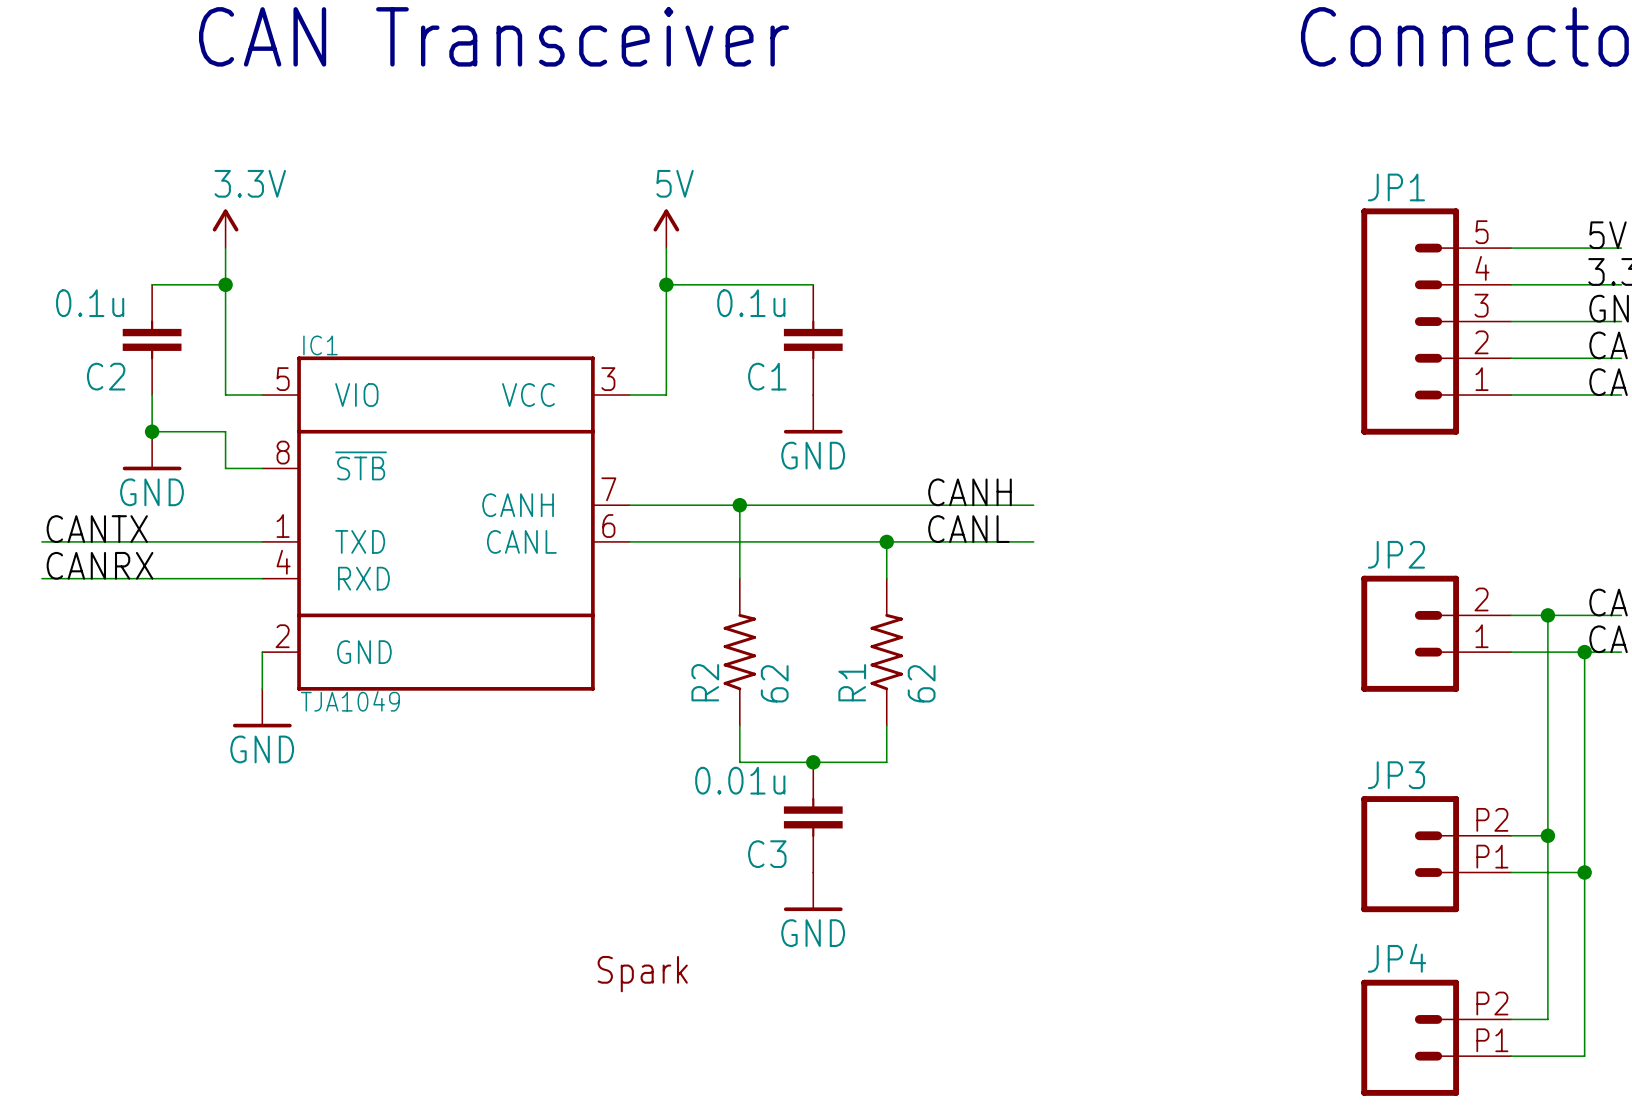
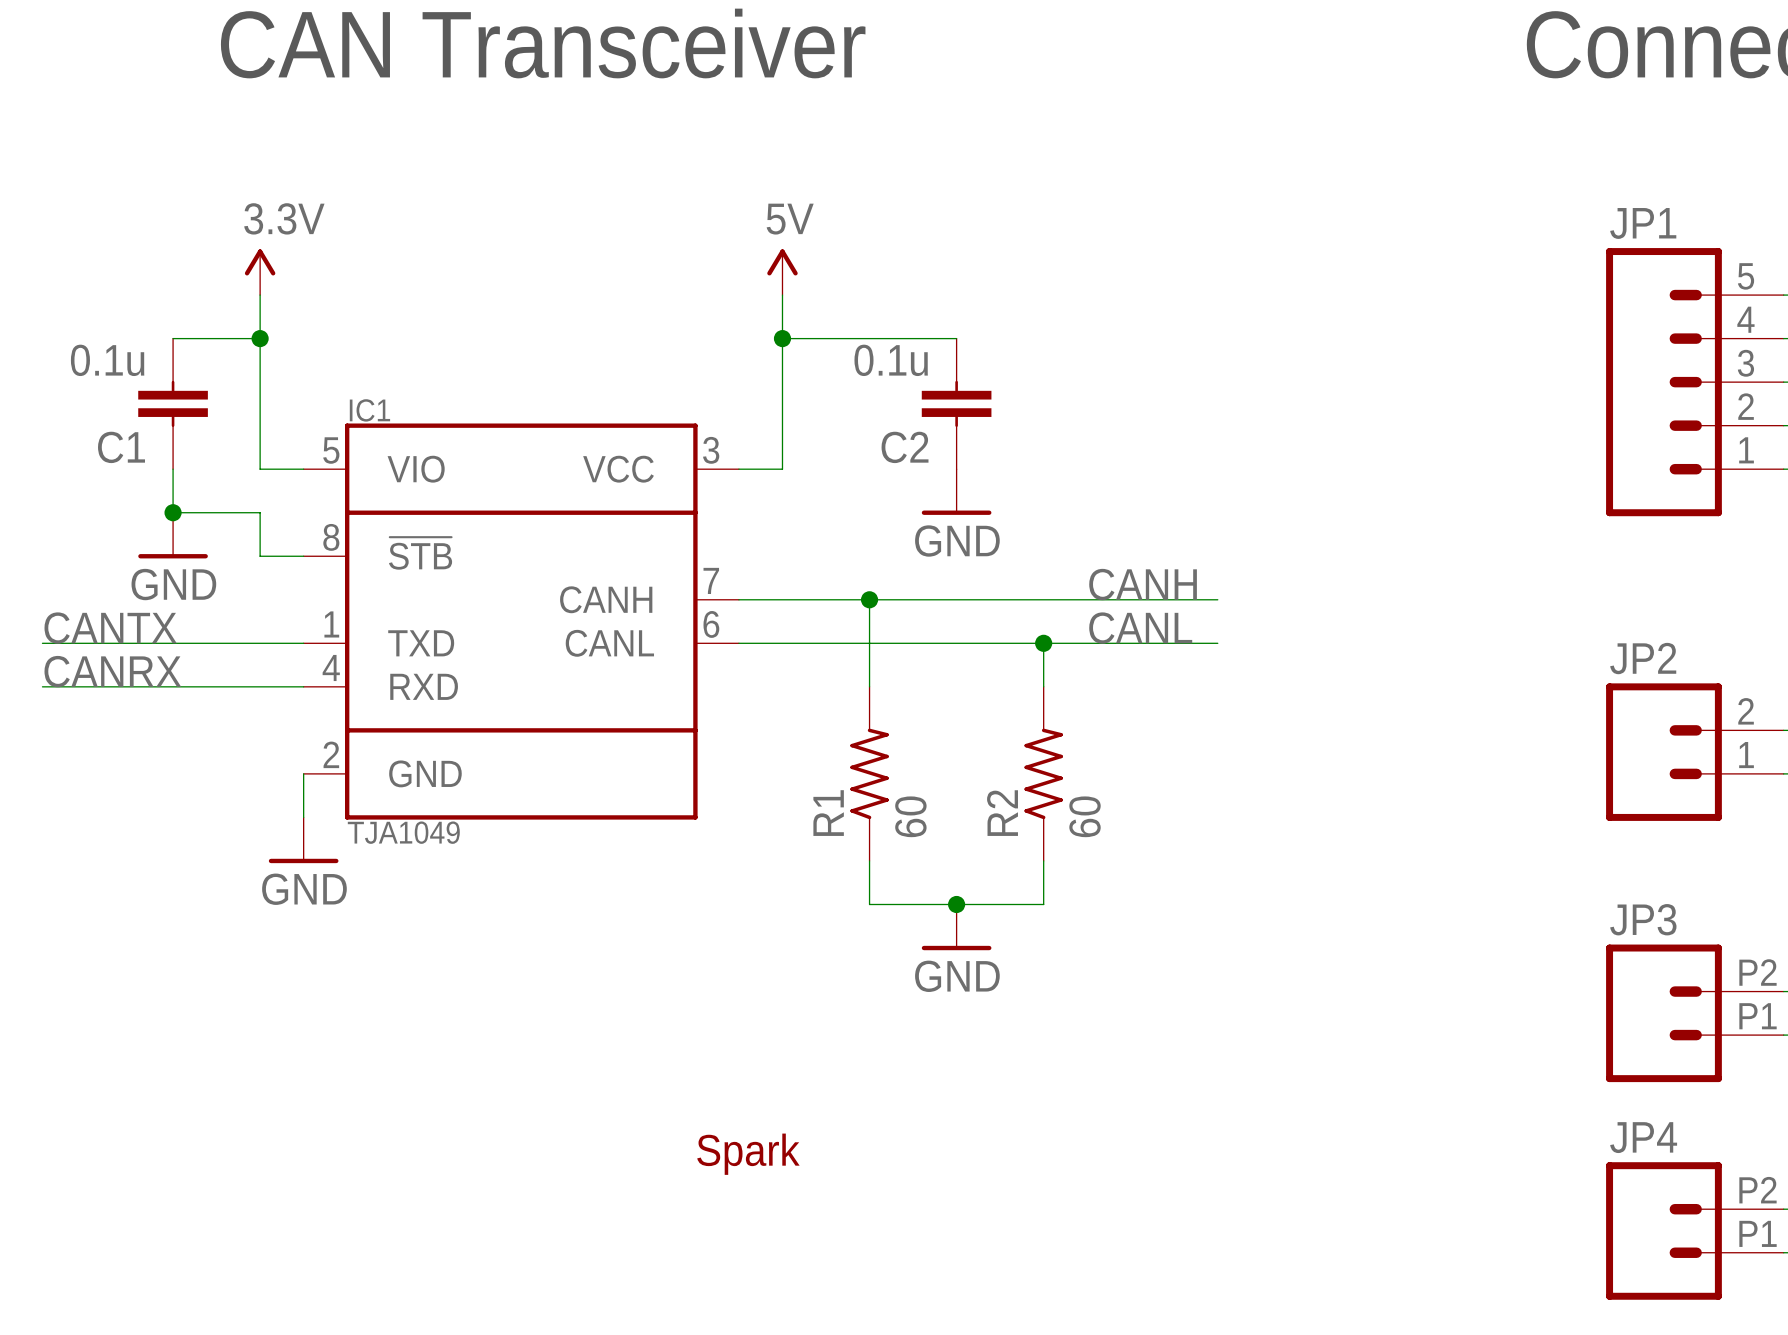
C2 name: C2 (106, 376) -> C1 (121, 447)
C1 name: C1 (767, 376) -> C2 (905, 447)
R2 name: R2 (705, 682) -> R1 (828, 813)
R1 name: R1 (852, 682) -> R2 (1002, 813)
R2 value: 62 (774, 683) -> 60 (910, 816)
R1 value: 62 (921, 683) -> 60 (1085, 816)
C3: 0.01u (813, 817) -> none
power symbol position: GND (813, 891) -> GND (956, 927)

